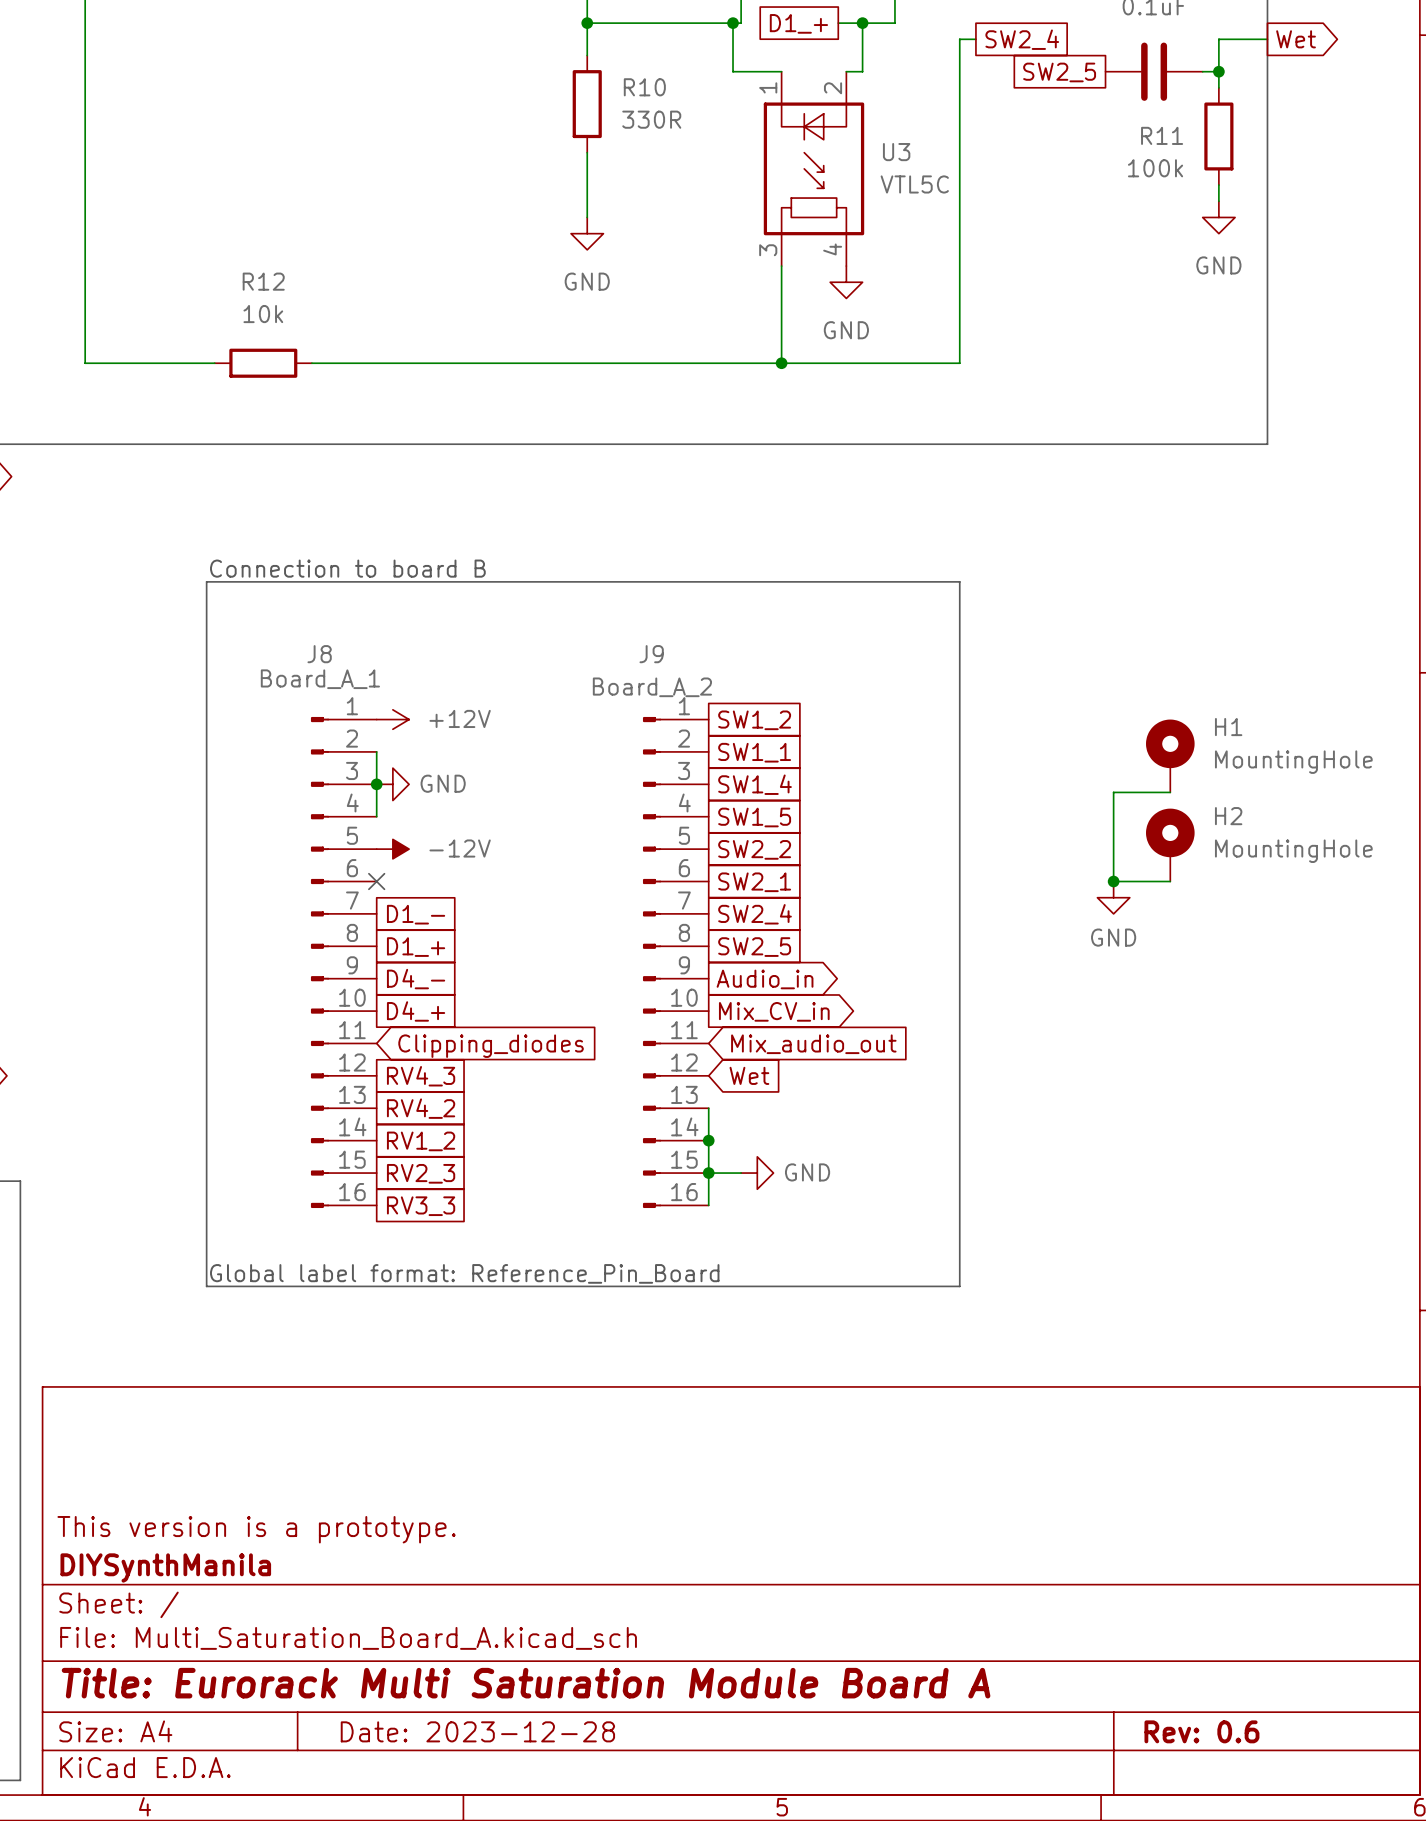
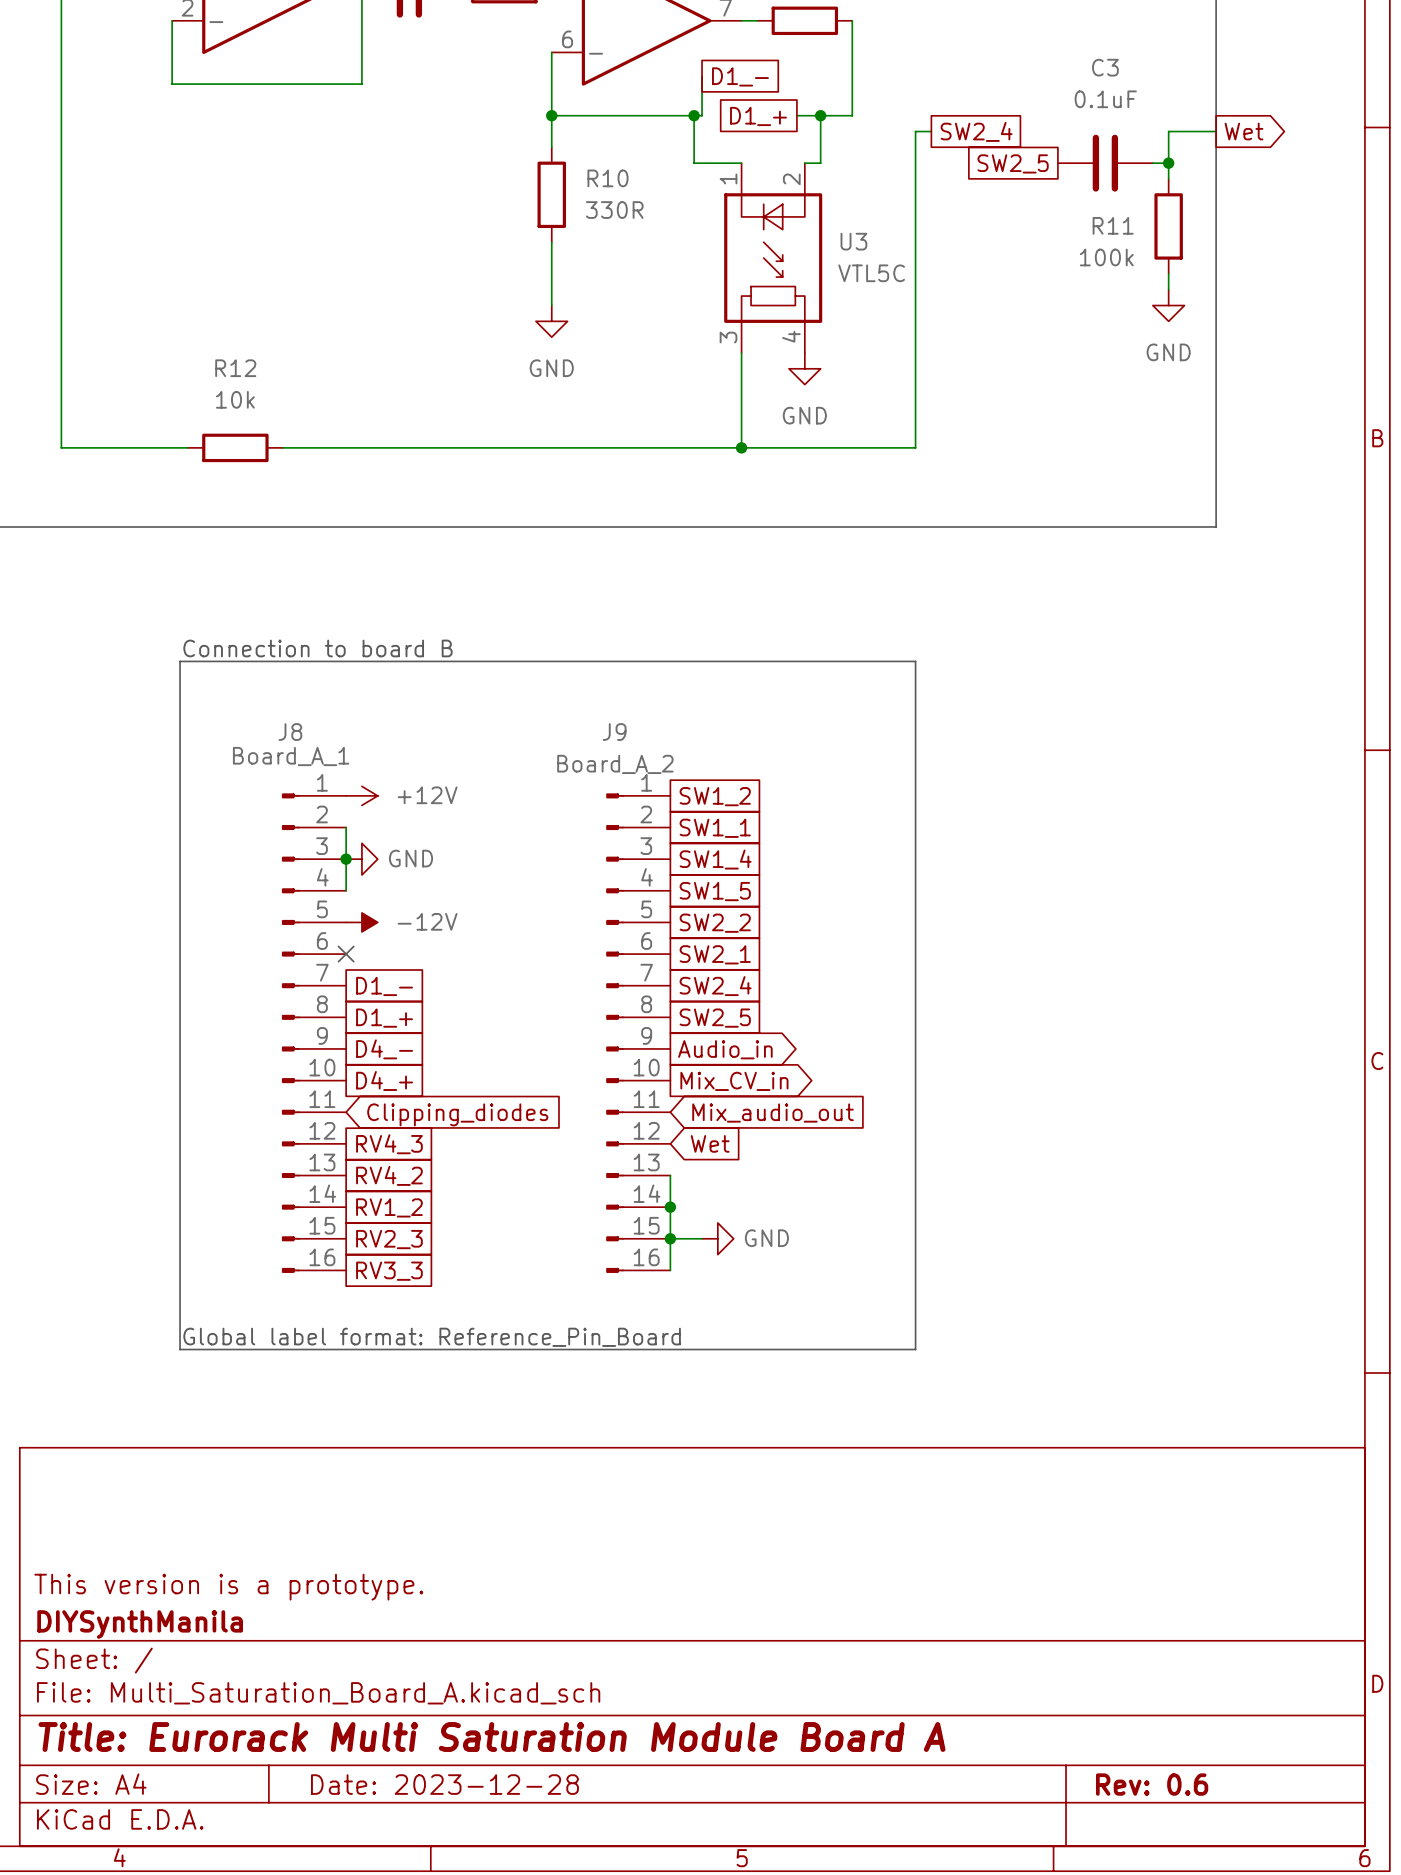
H1: MountingHole (1170, 755) -> none
wire: (1170, 792) (1113, 792) (1113, 881) (1170, 881) -> none
H2: MountingHole (1170, 845) -> none
junction: (1113, 881) -> none
power symbol: GND (1113, 897) -> none

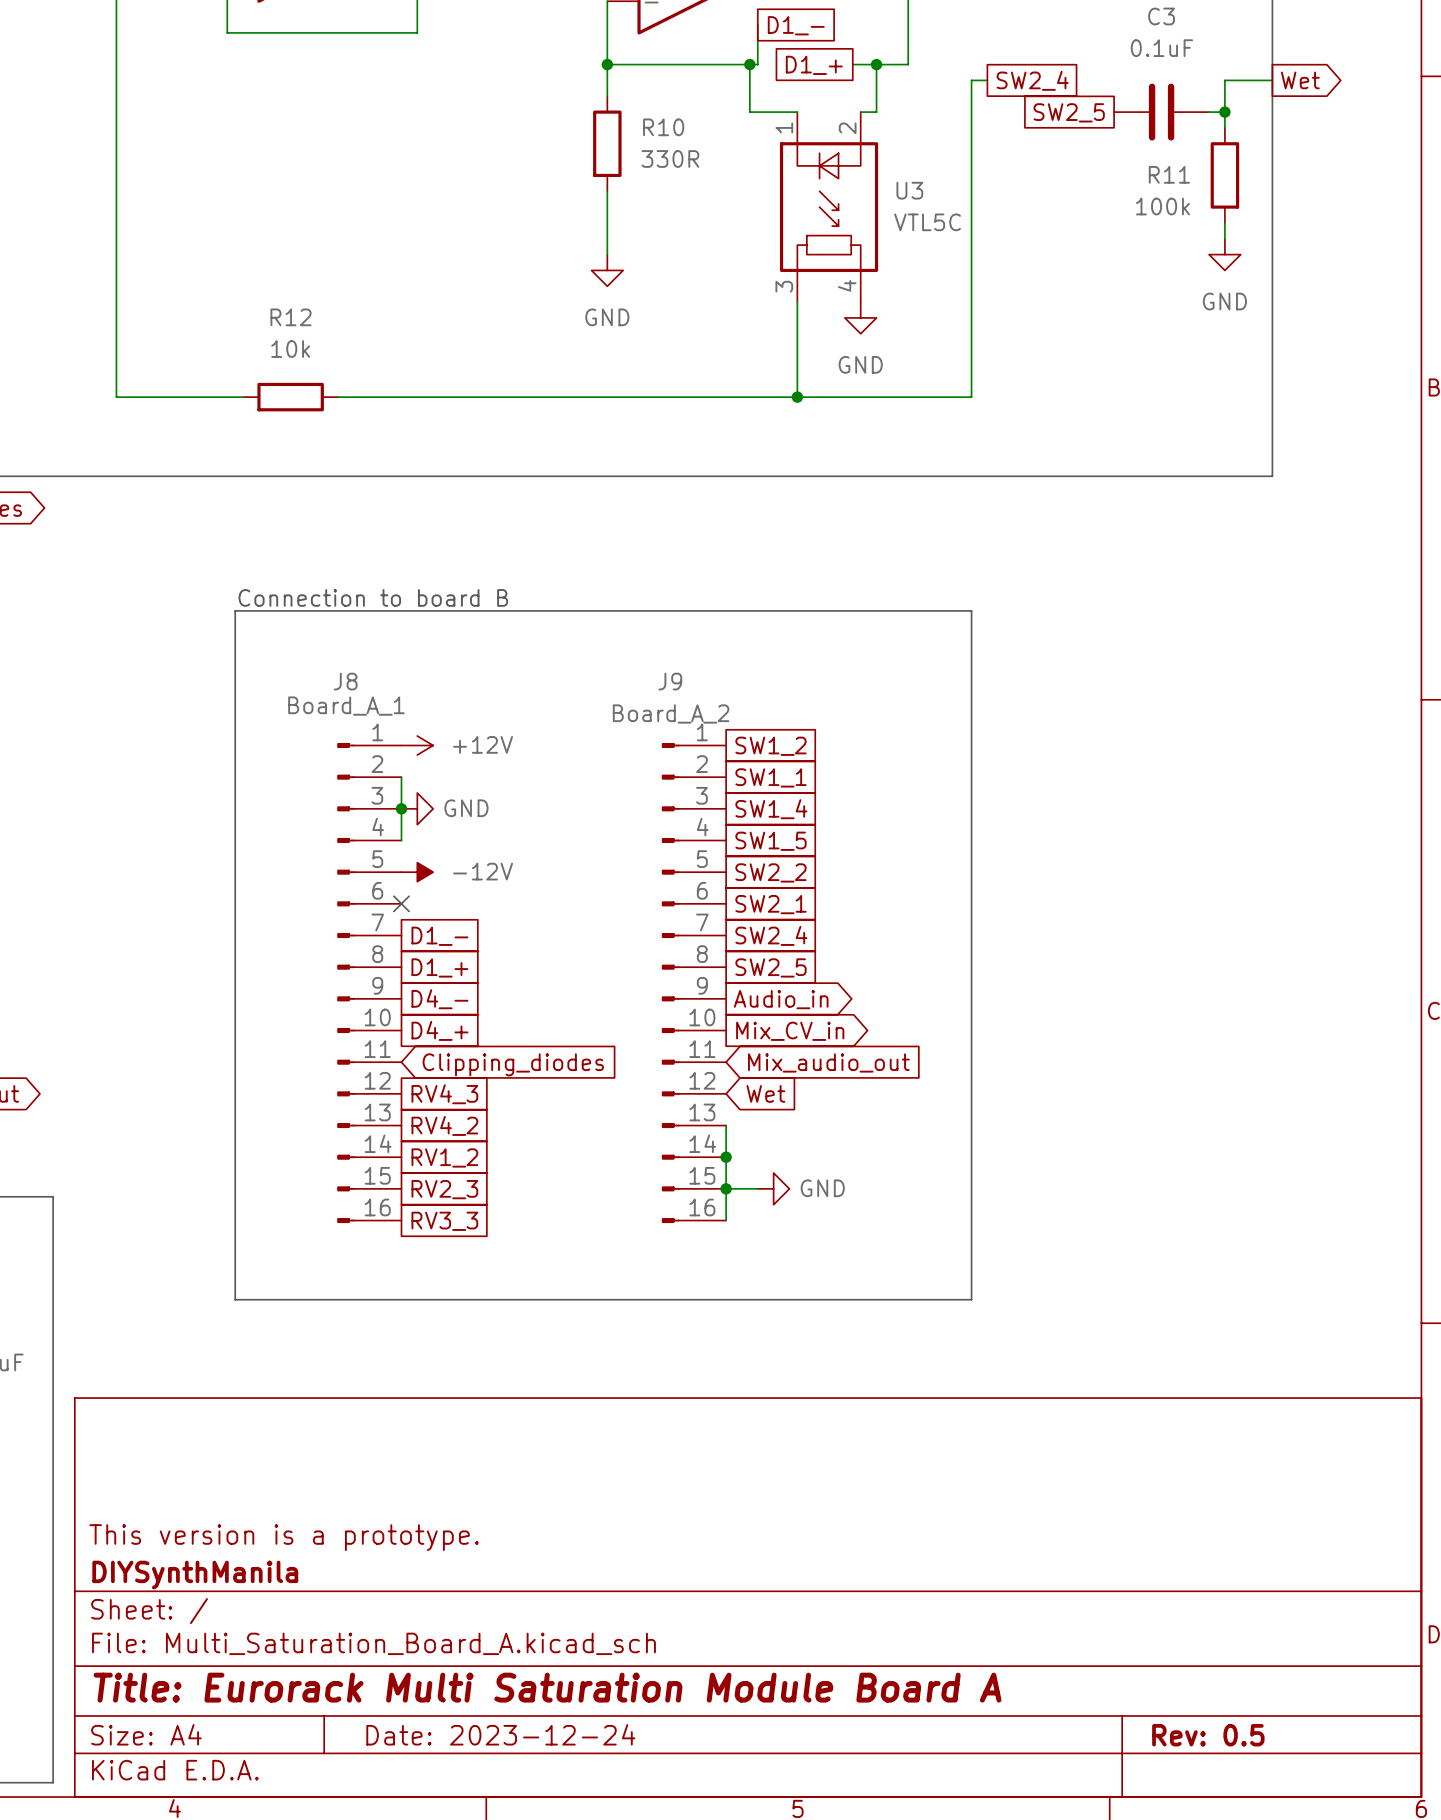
text: Global label format: Reference_Pin_Board (432, 1337) -> none
title block: Date: 2023-12-28 (444, 1784) -> Date: 2023-12-24 (500, 1734)
title block: Rev: 0.6 (1152, 1784) -> Rev: 0.5 (1208, 1735)

